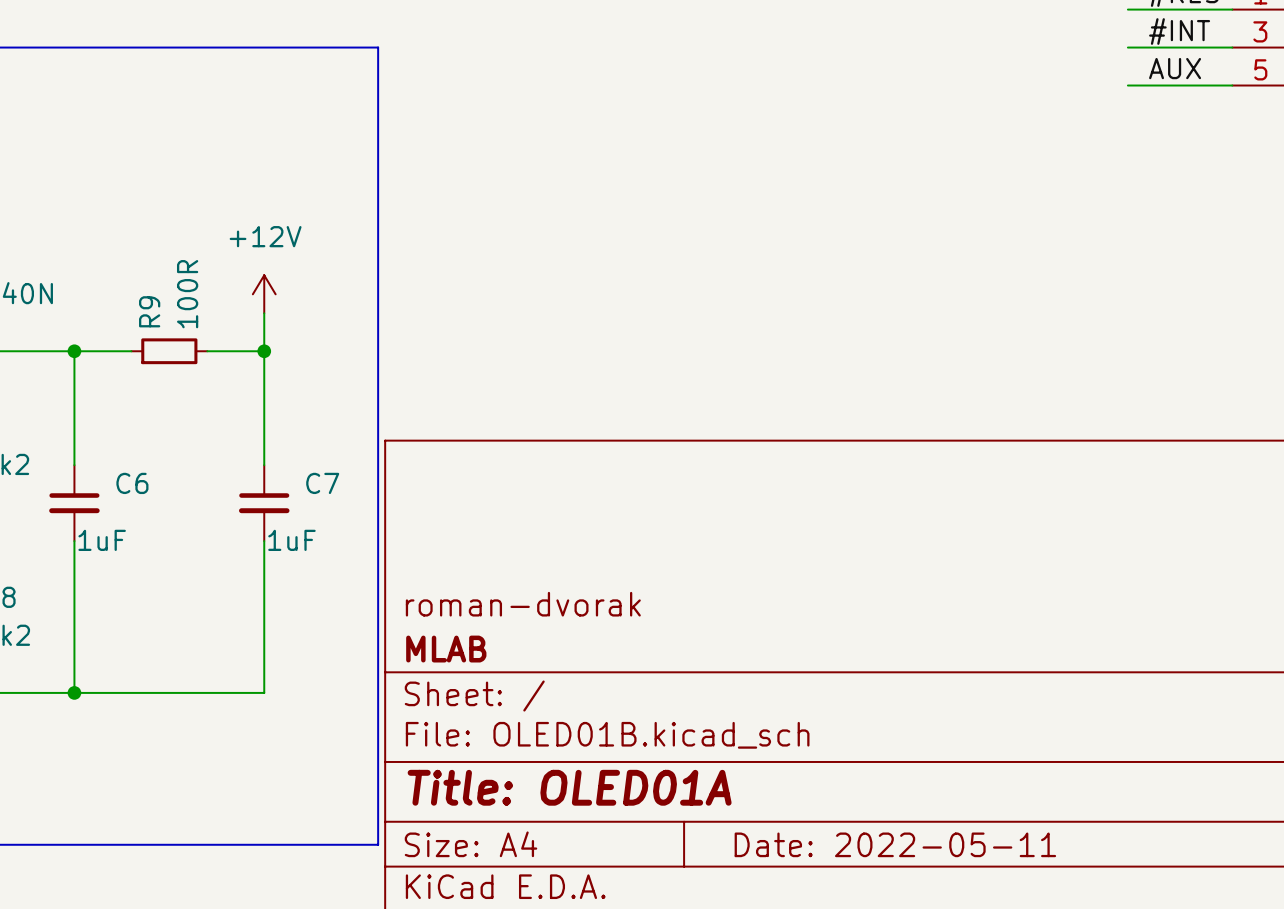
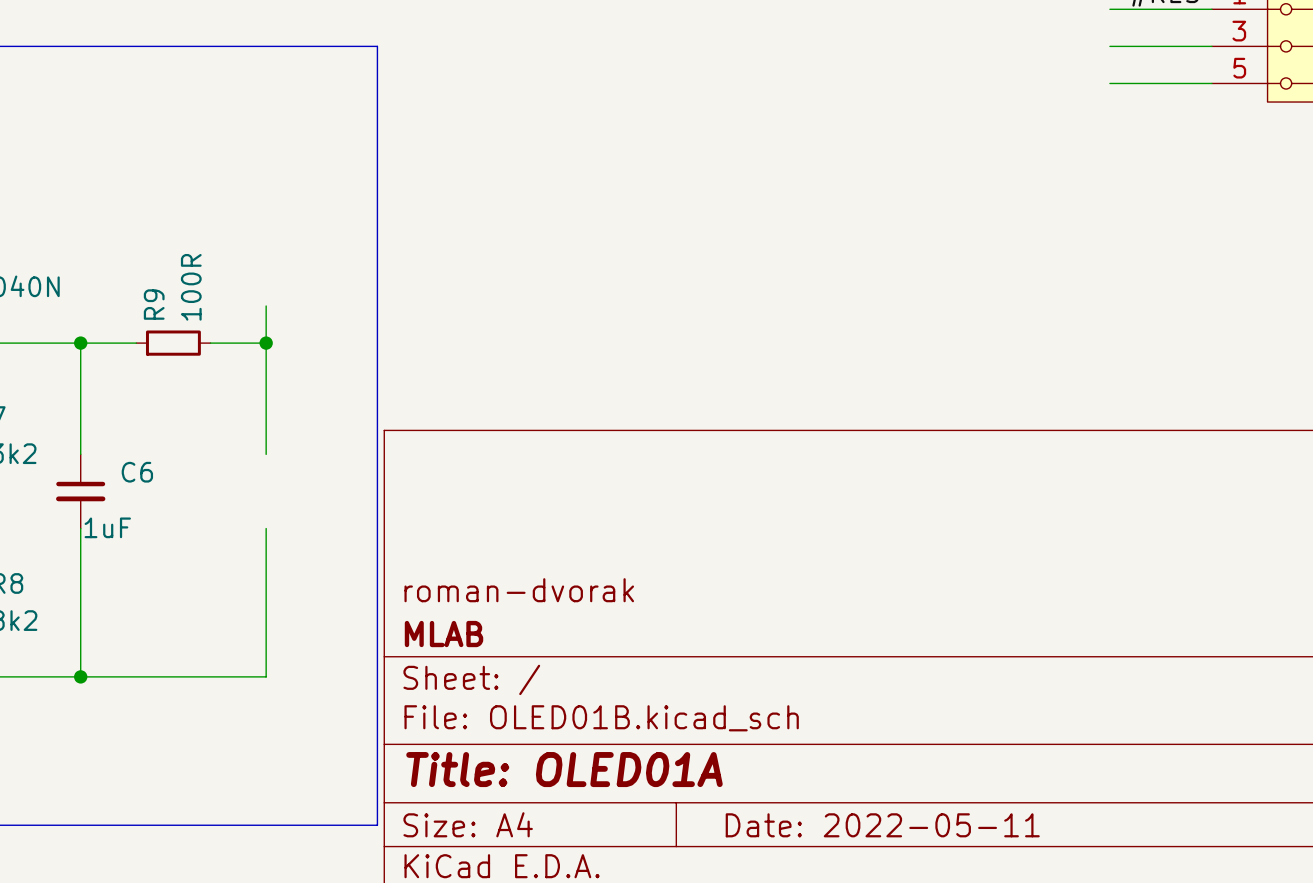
label: #INT (1179, 31) -> none
label: AUX (1175, 68) -> none
power symbol: +12V (264, 294) -> none
C7: 1uF (264, 503) -> none

